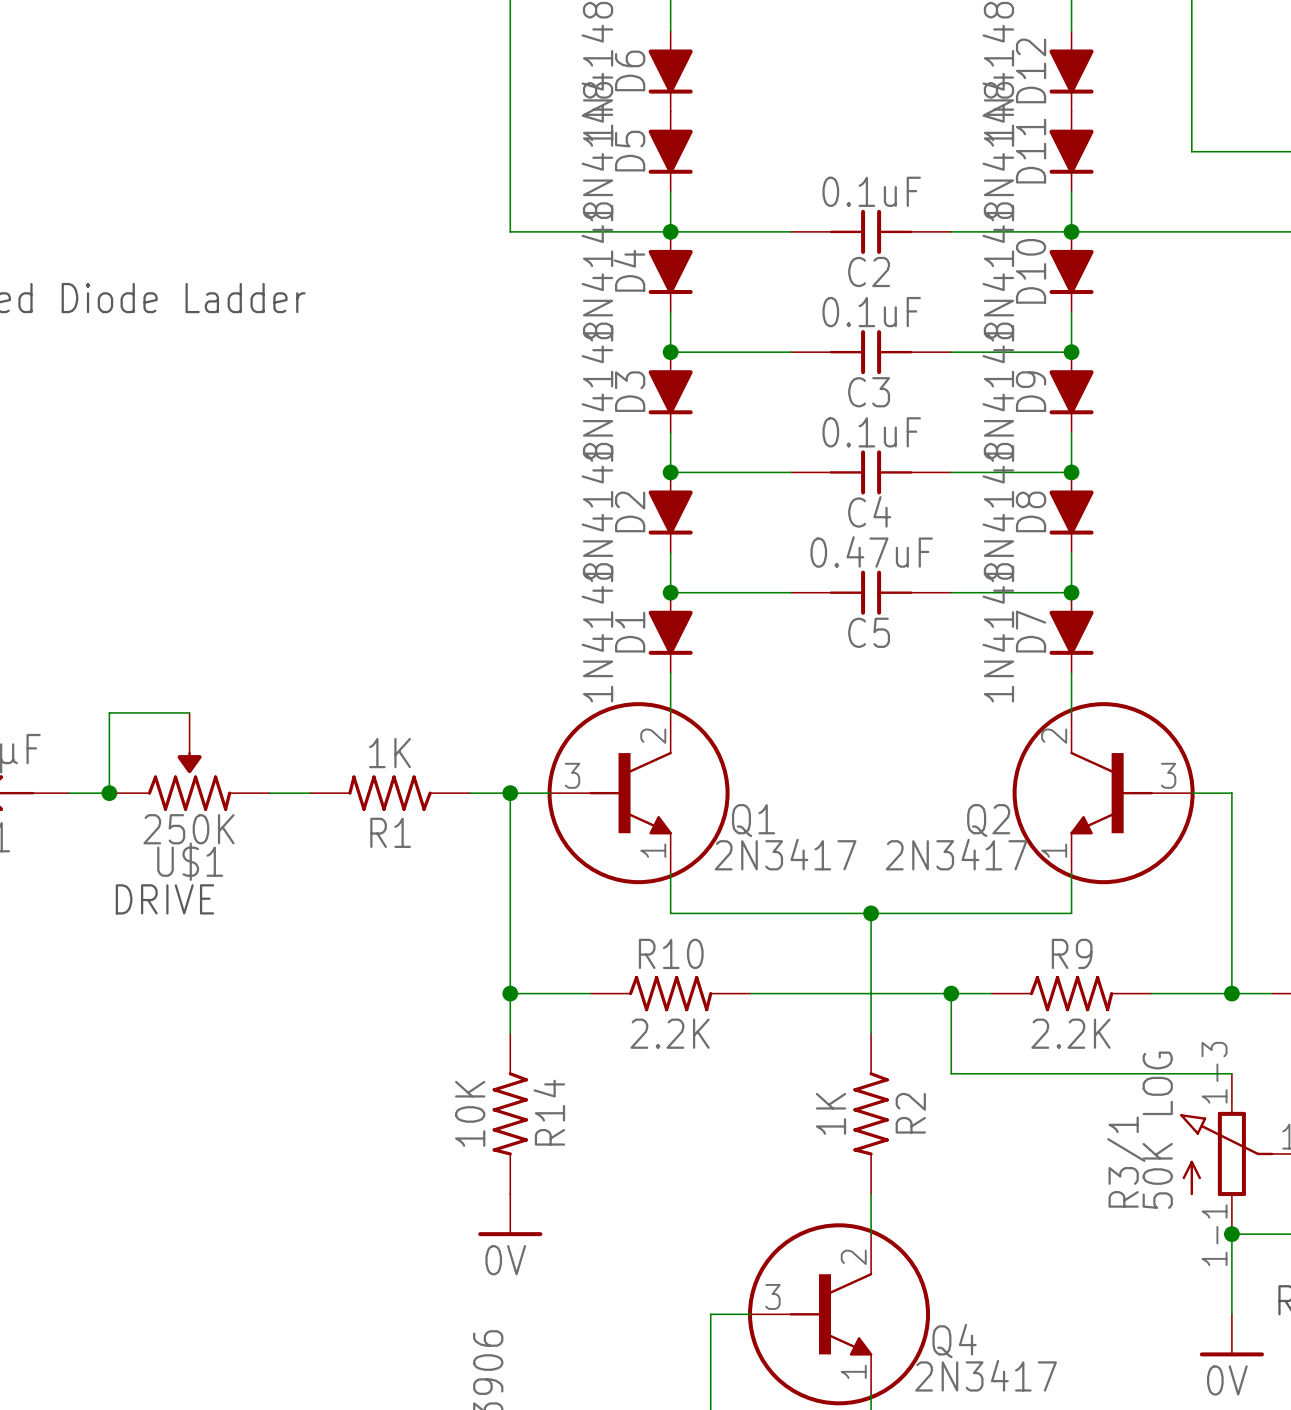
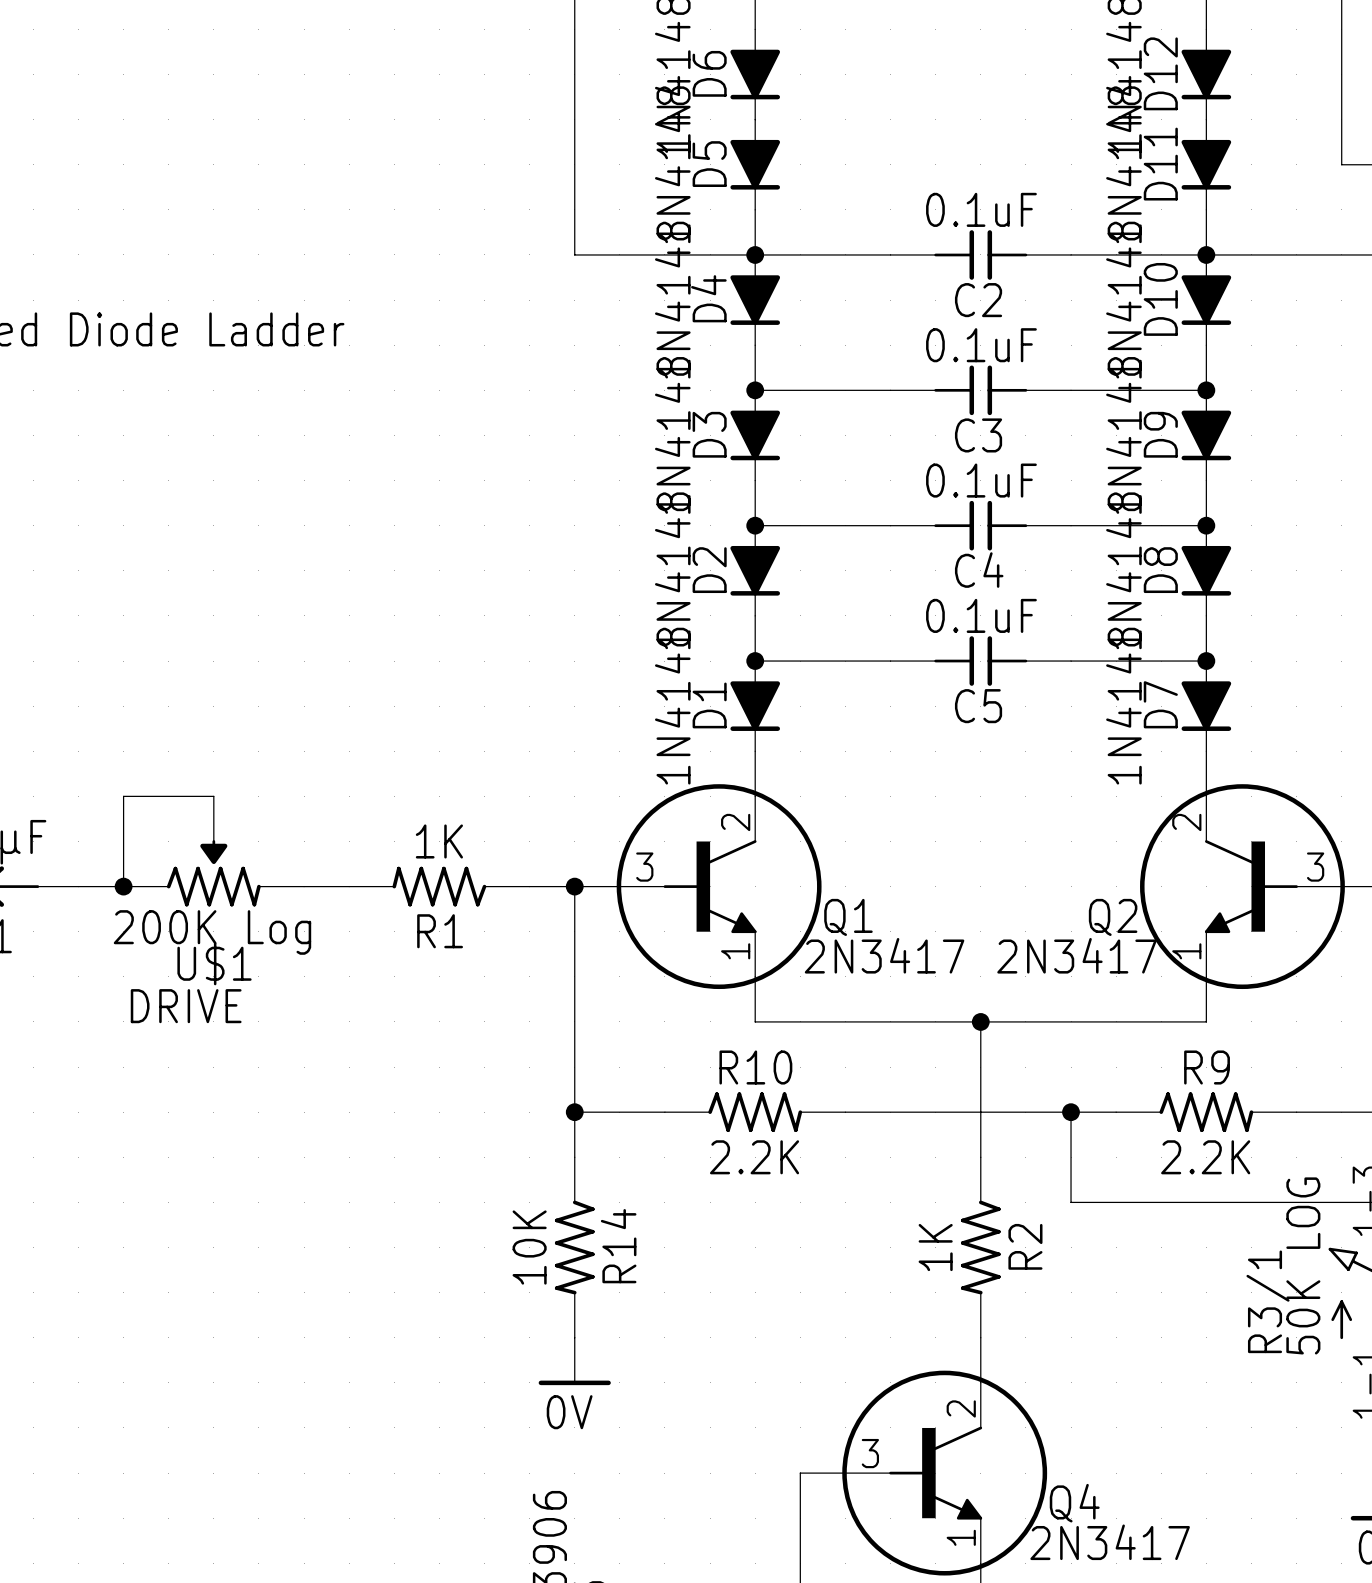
C5 value: 0.47uF (871, 551) -> 0.1uF (981, 615)
U$1 value: 250K (188, 829) -> 200K Log (212, 932)

